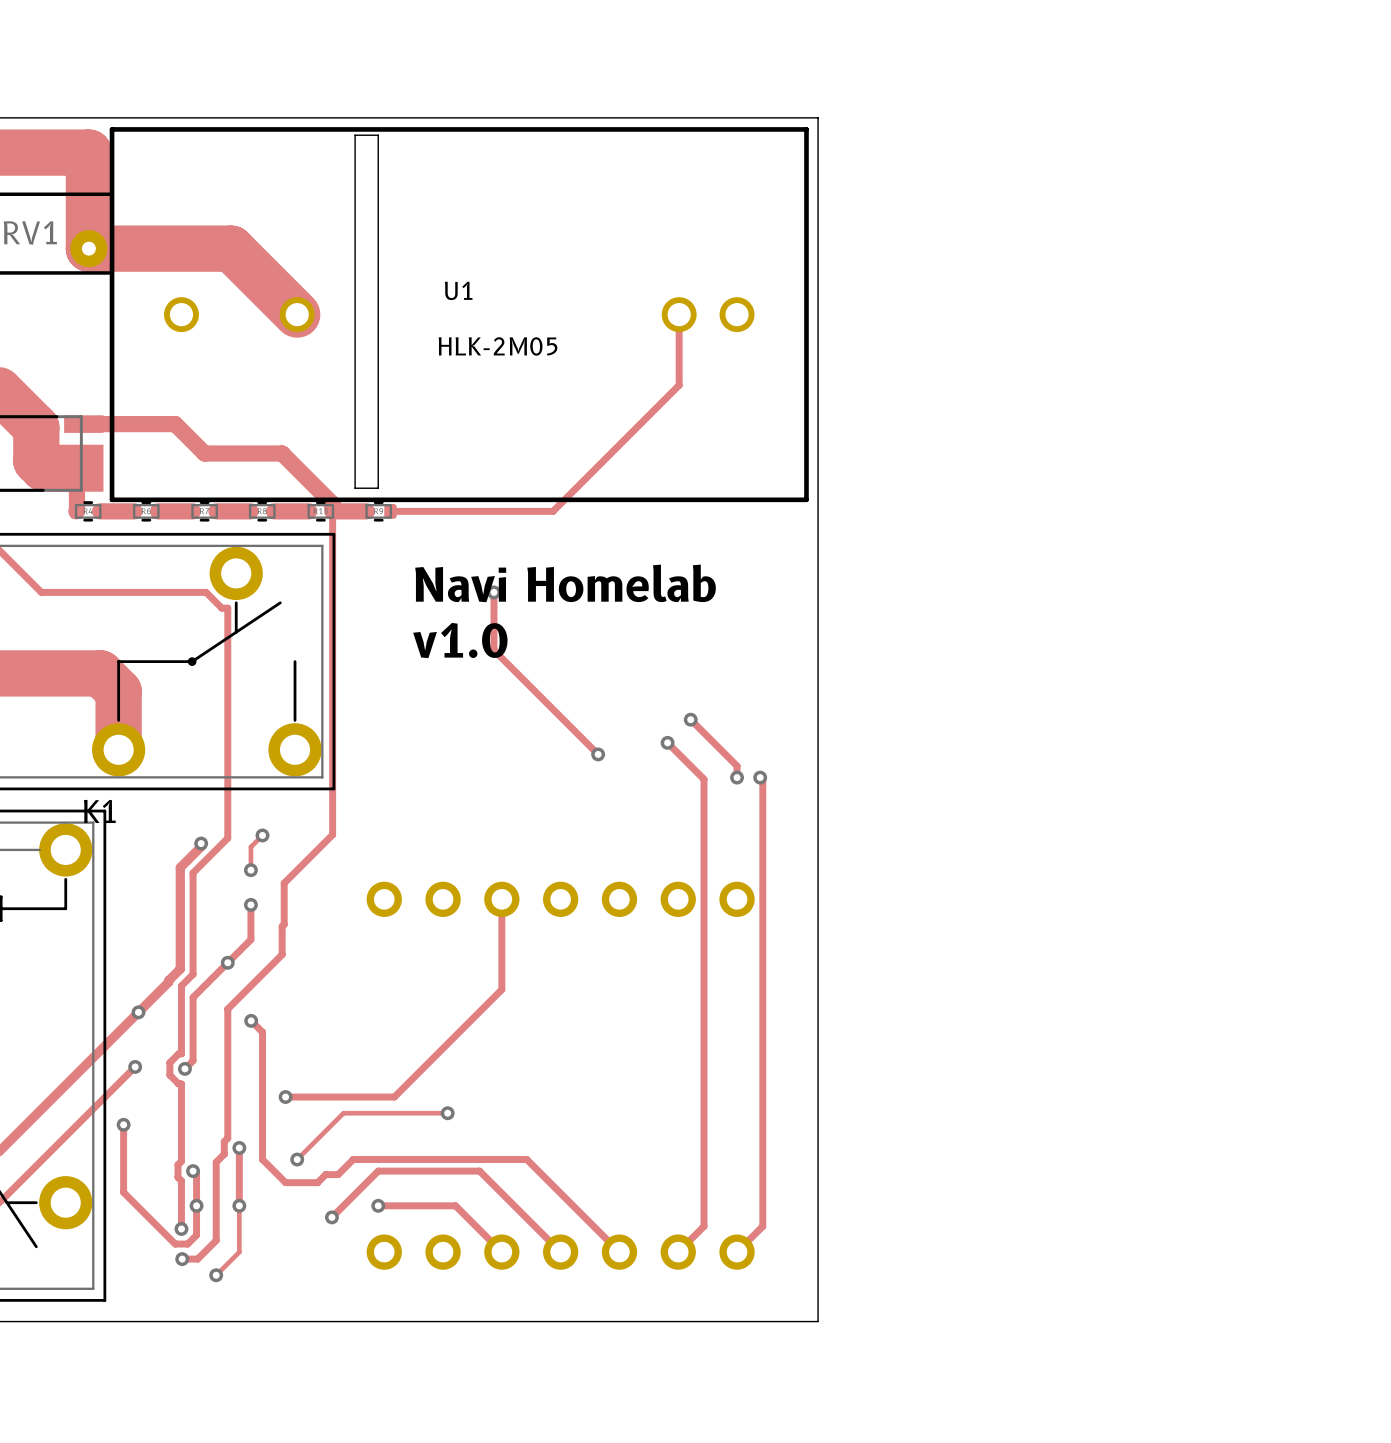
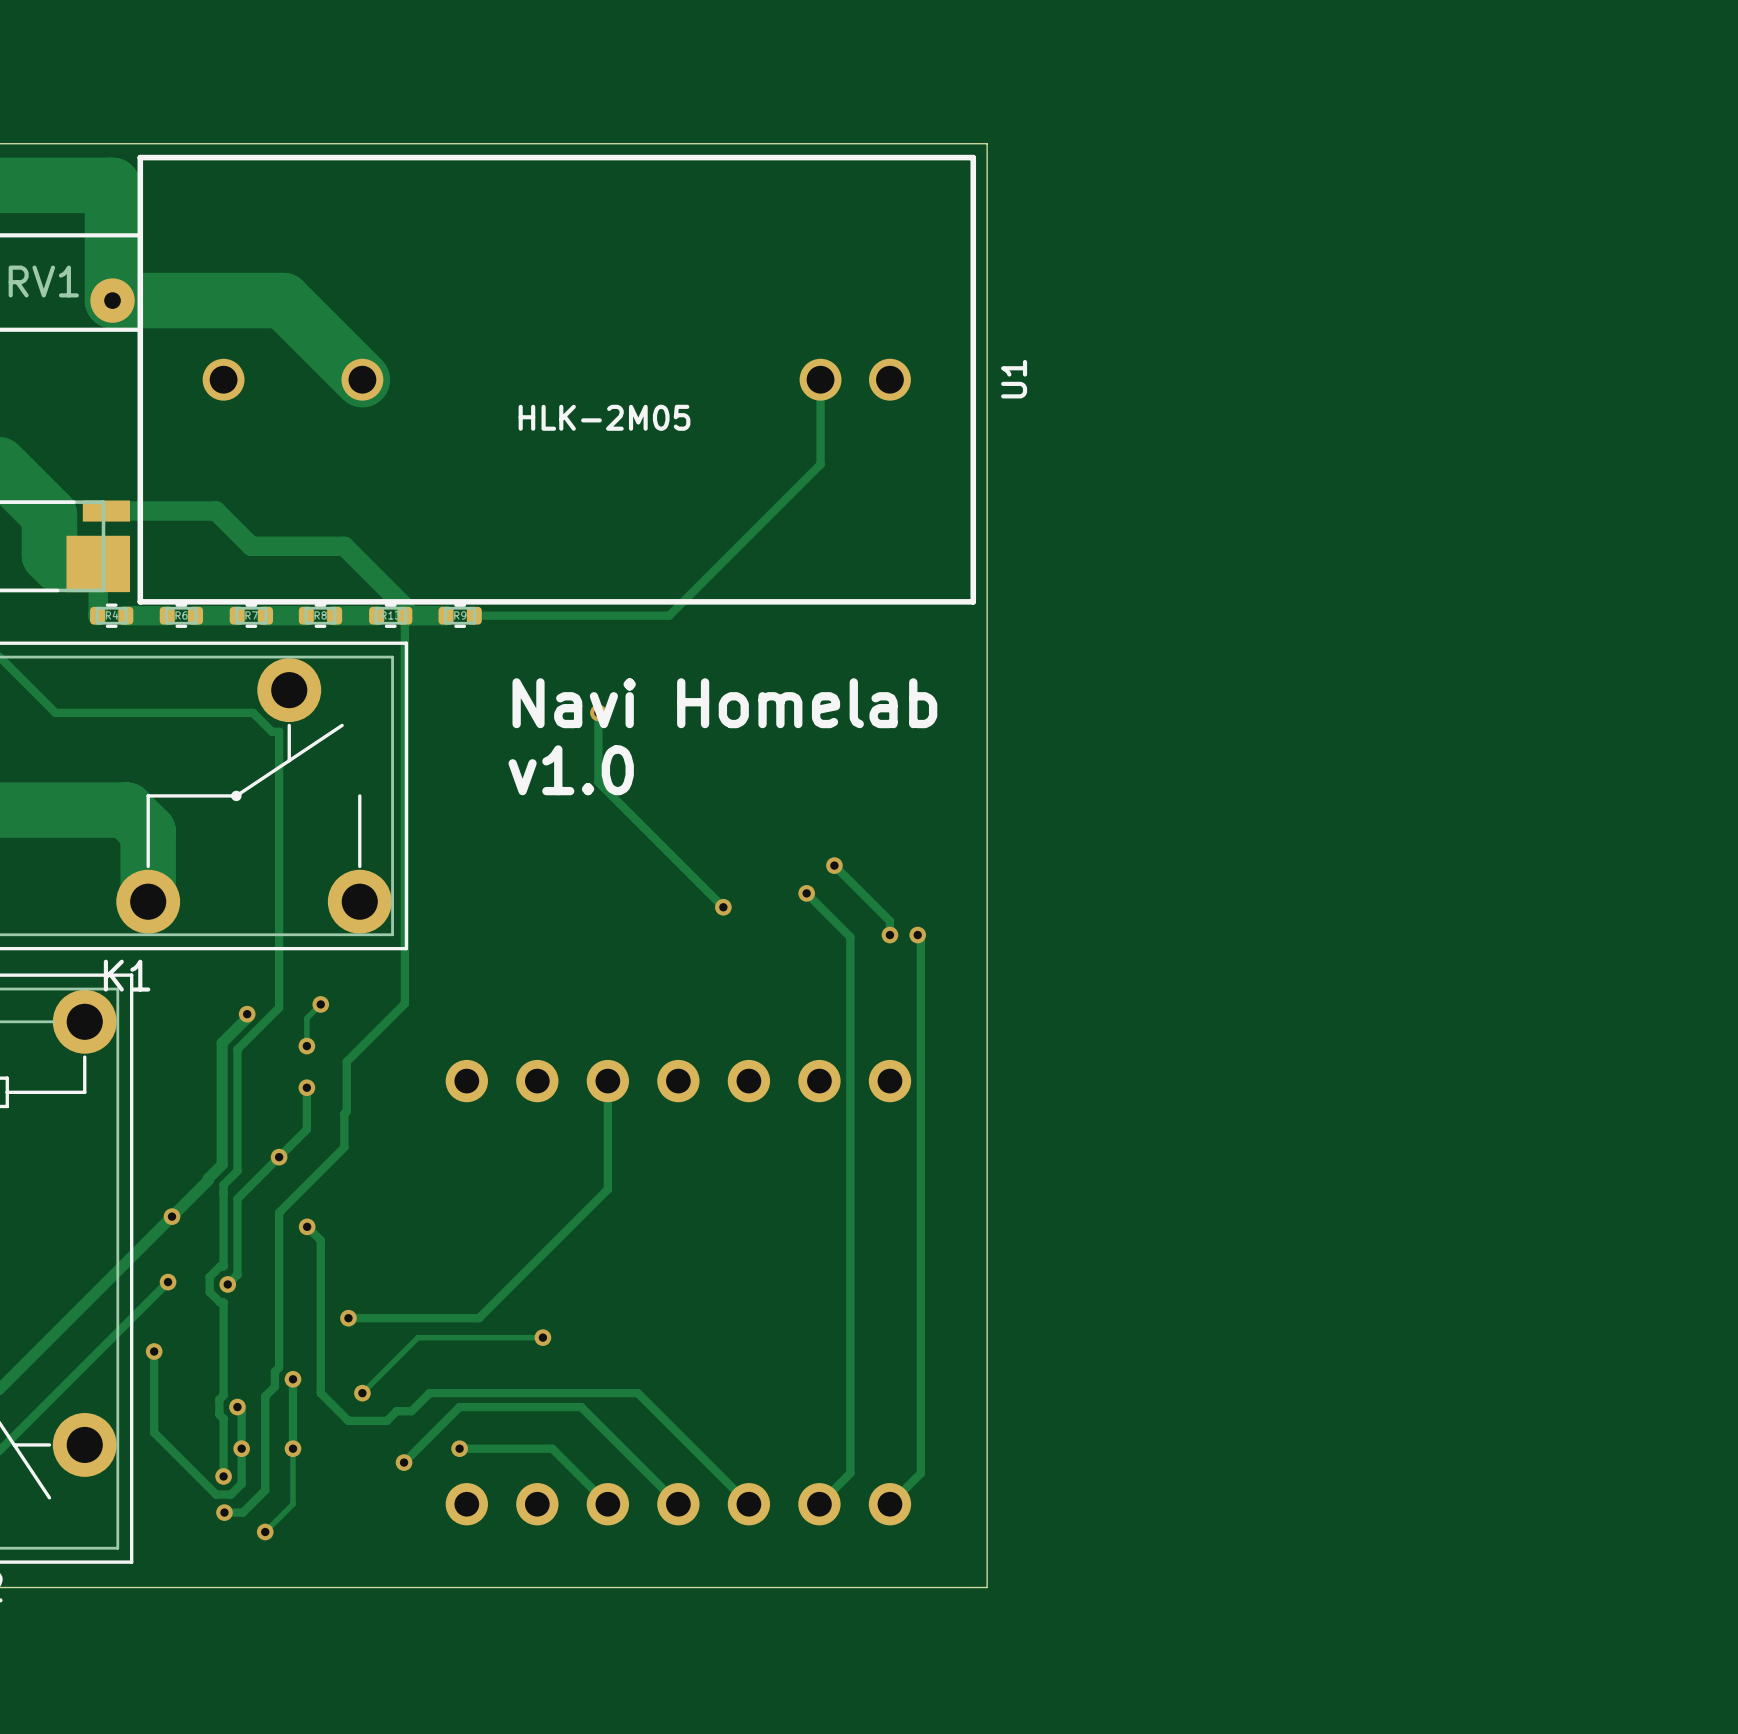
board edge: (355, 135) (355, 488) (378, 488) (378, 135) (355, 135) -> none
U1 name rotation: 0° (458, 290) -> 90° counterclockwise (1014, 379)
U1 name position: U1 (458, 290) -> U1 (1014, 379)

